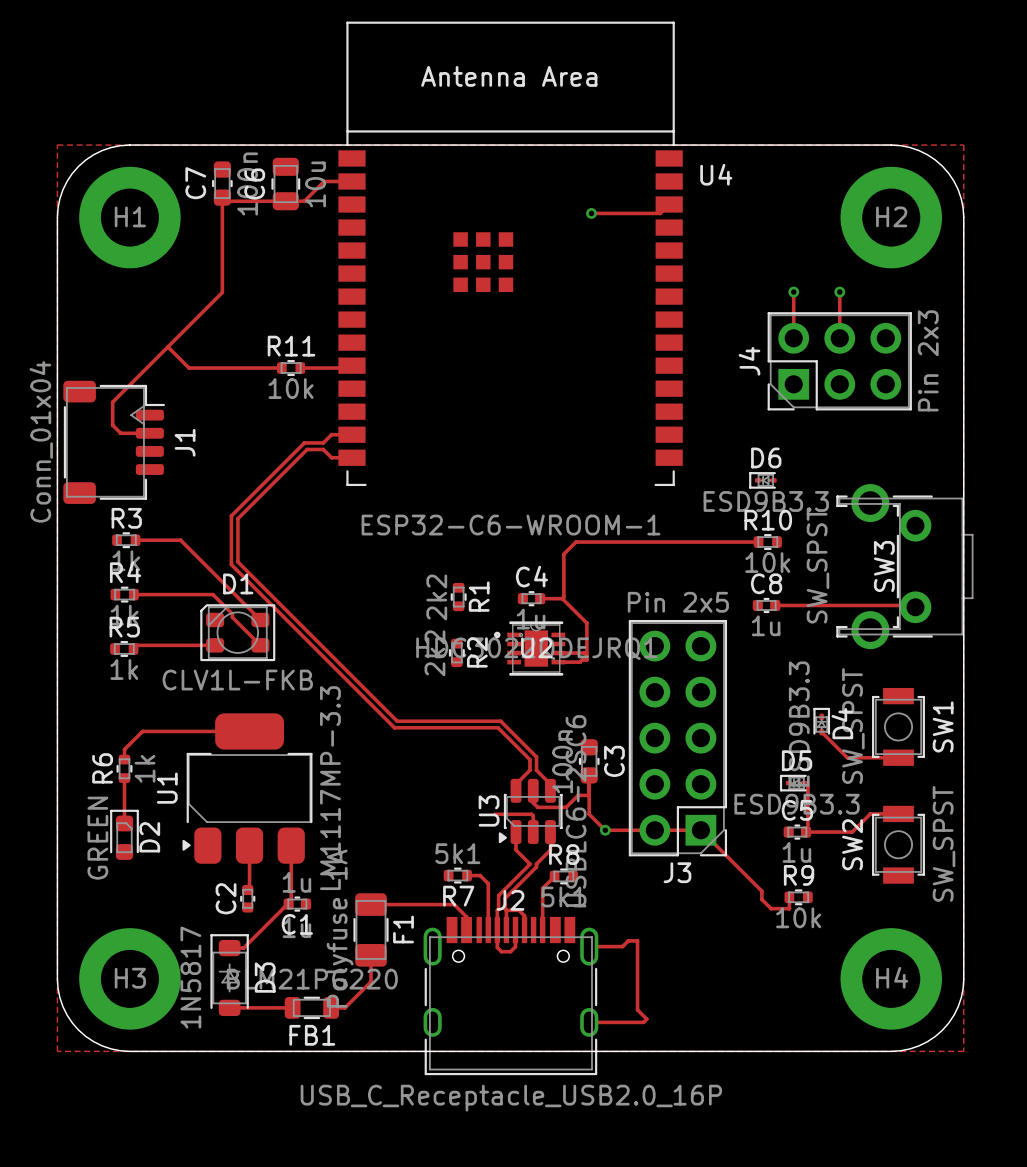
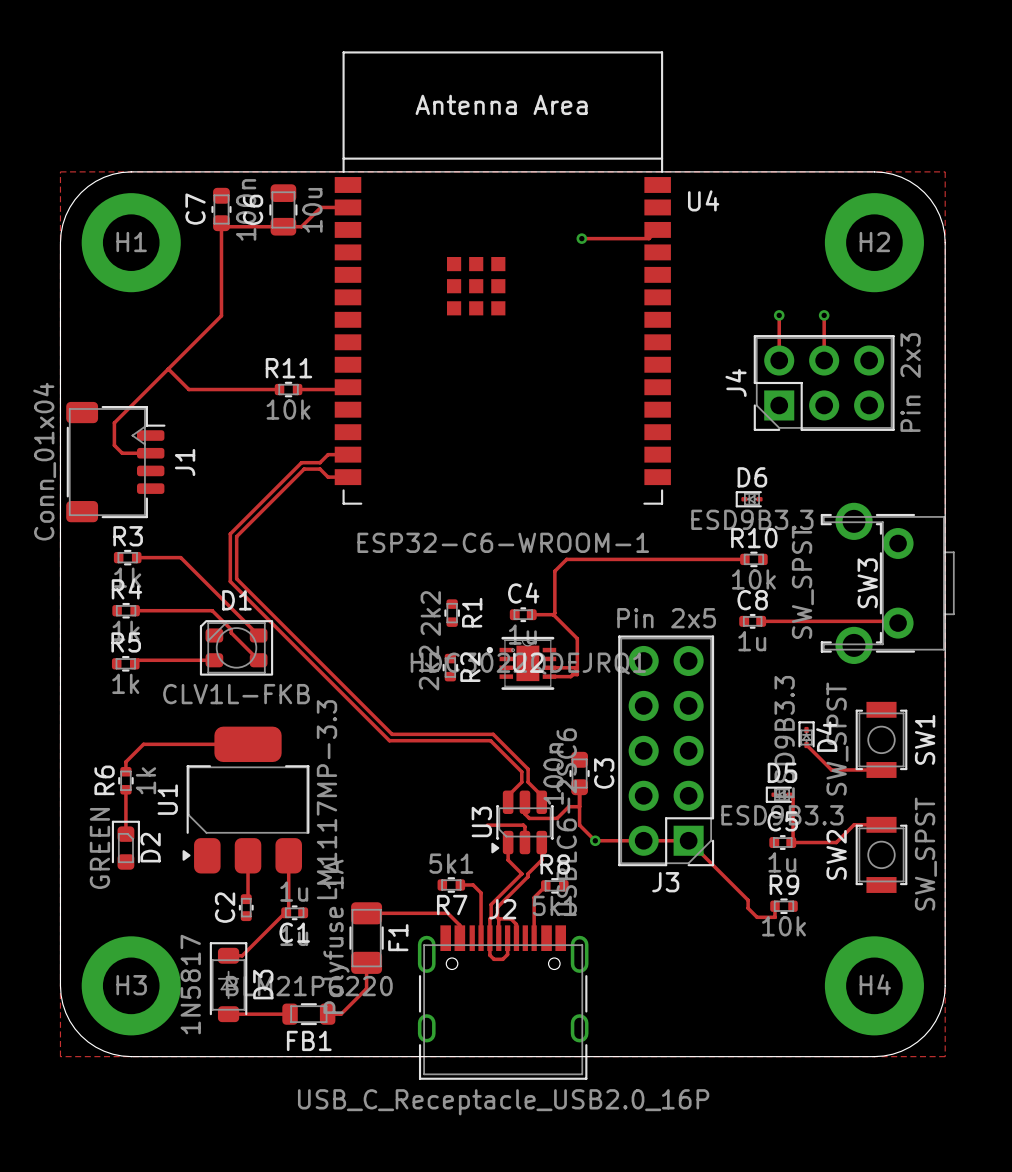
track: (589, 946) (622, 946) (628, 940) (637, 940) (637, 1009) (646, 1019) (643, 1022) (589, 1022) -> none

